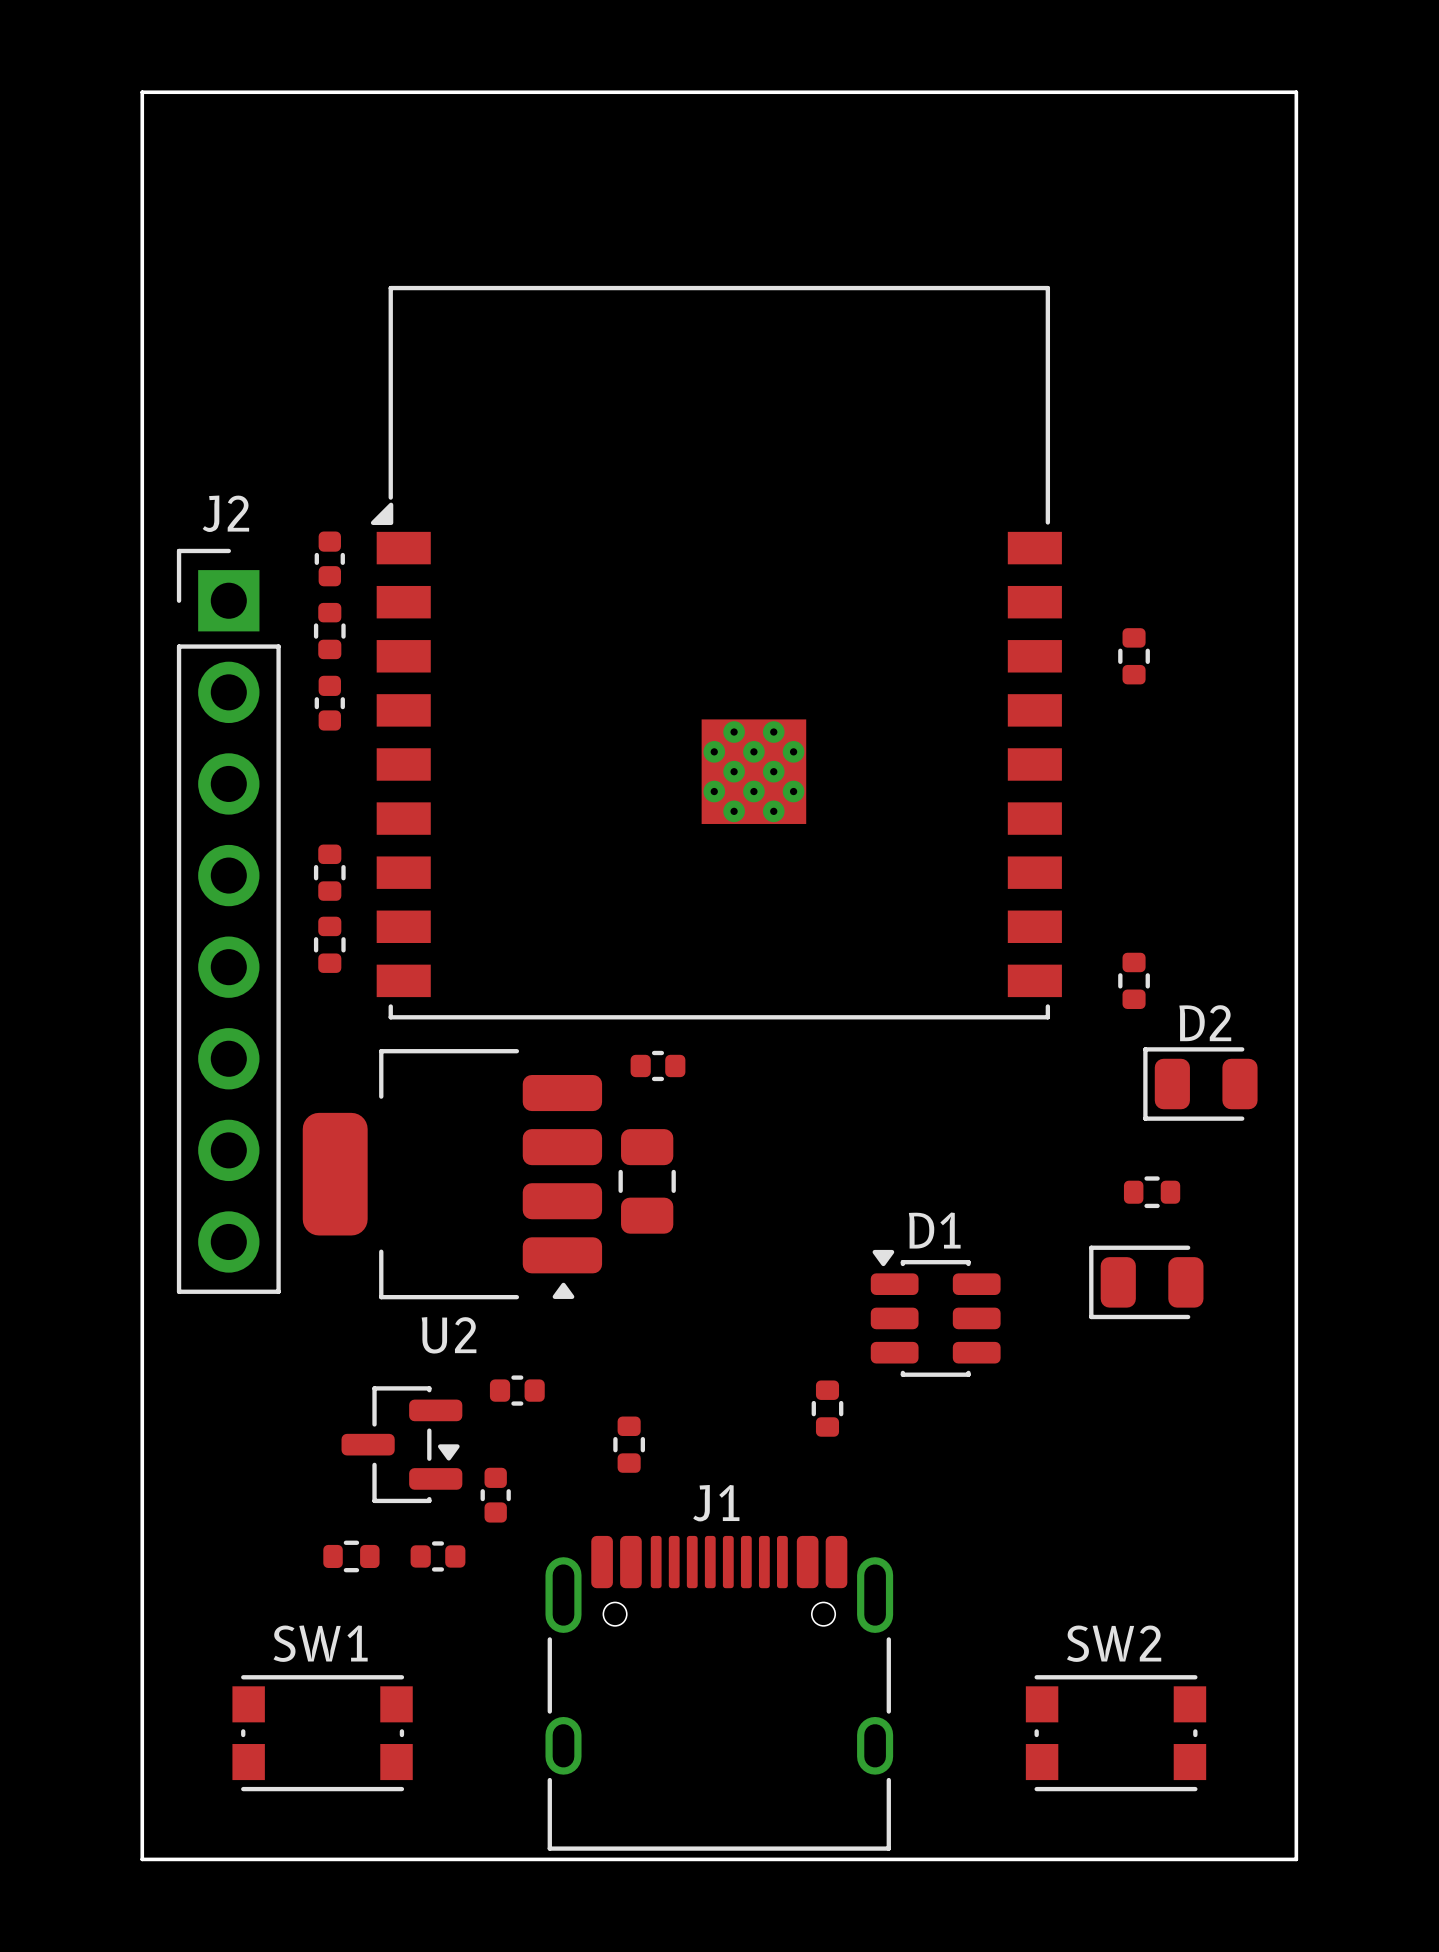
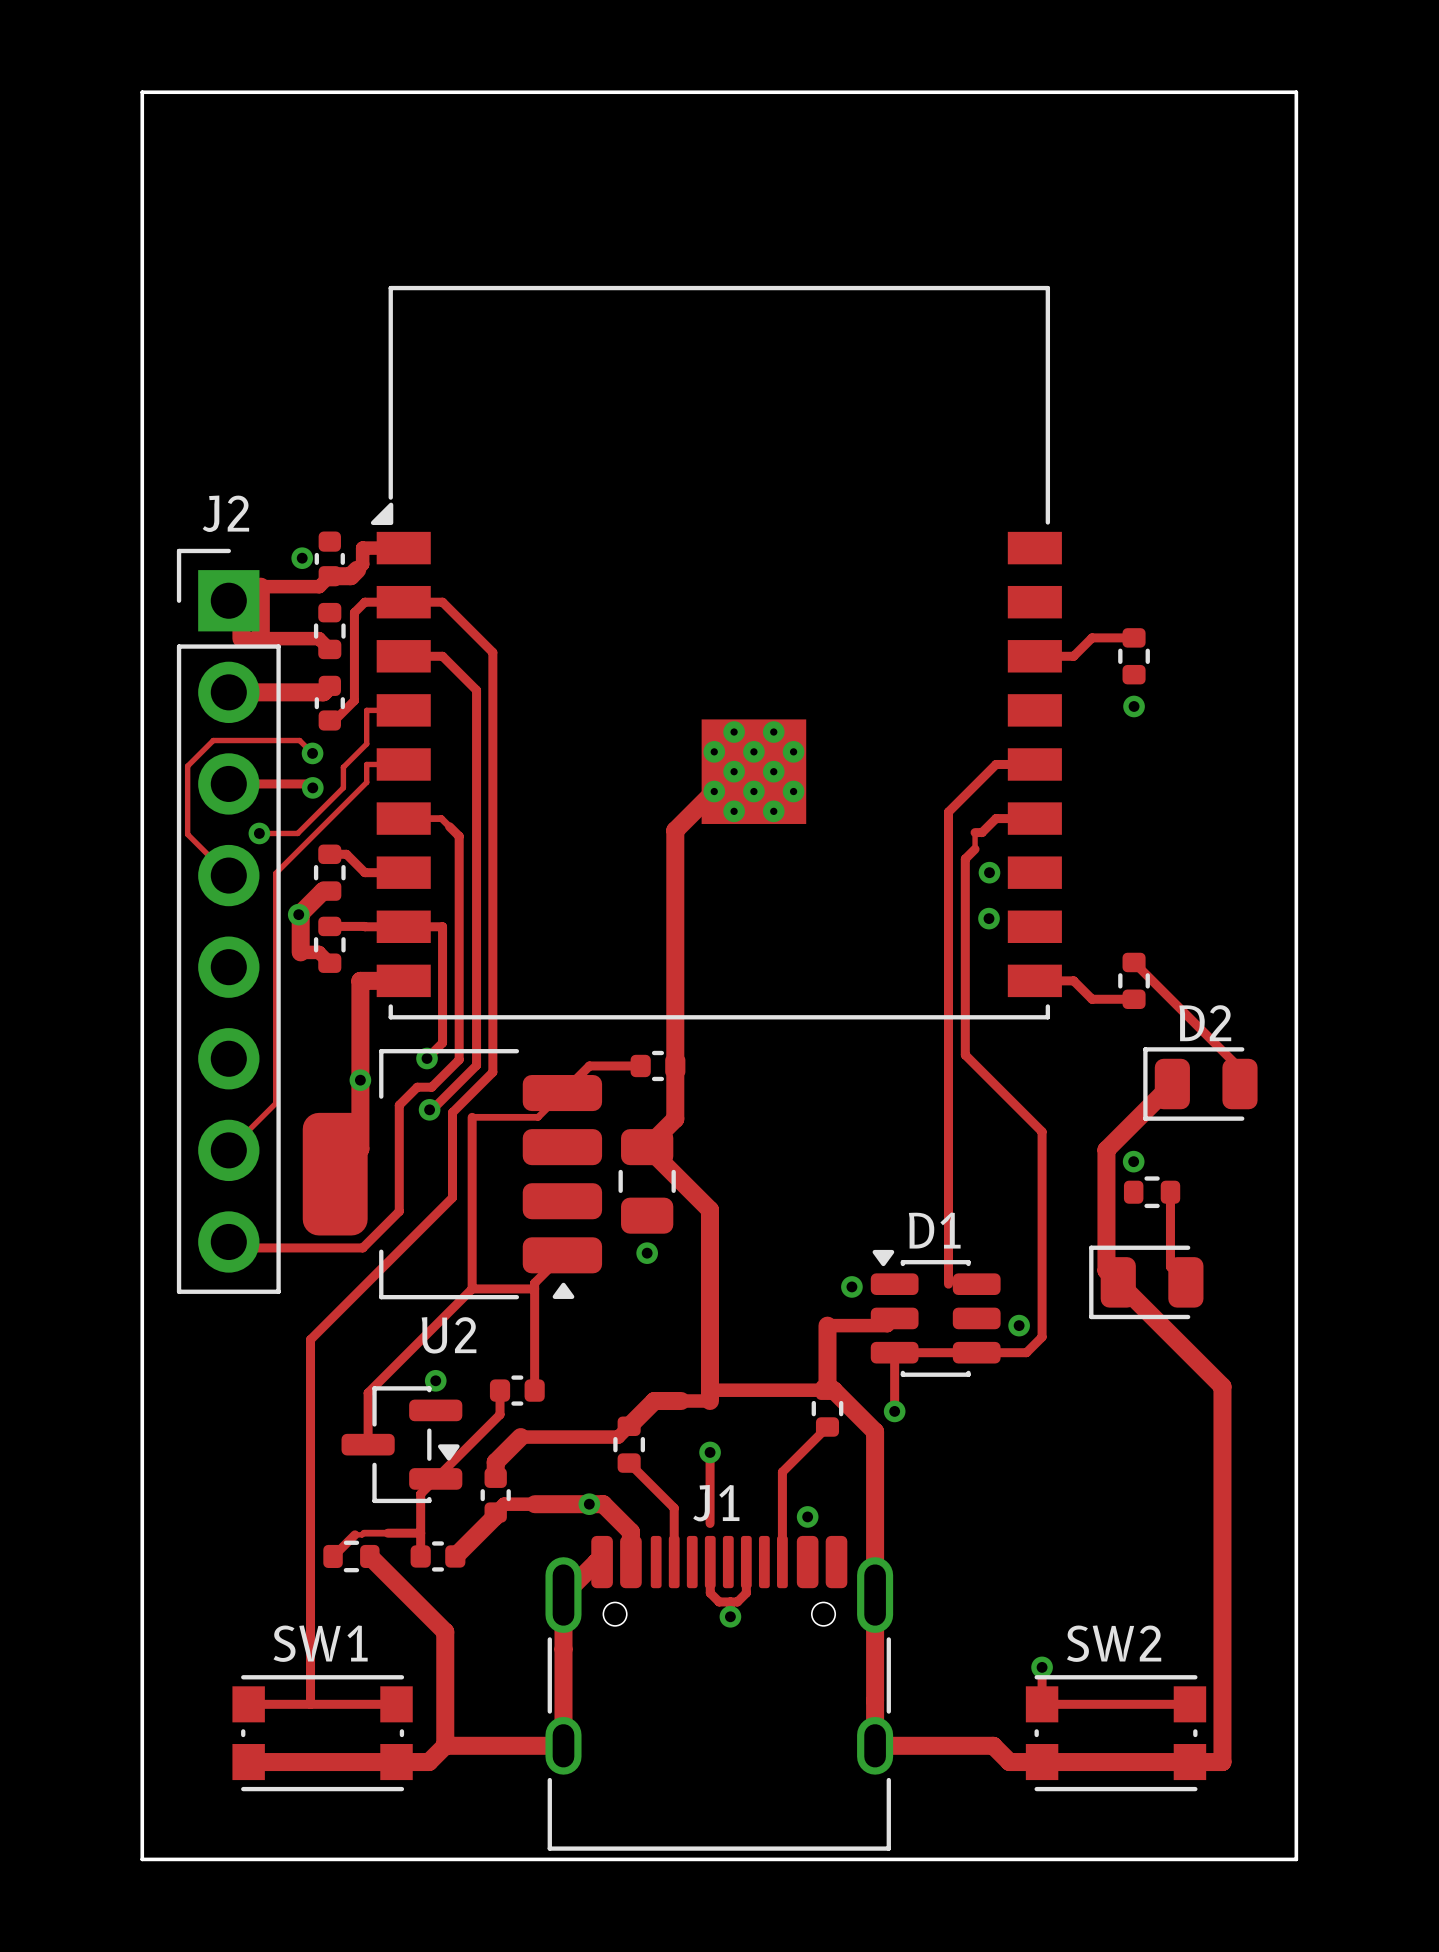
track: none -> (403, 548) (362, 548) (362, 564) (350, 576) (329, 576) (319, 586) (260, 586) (260, 638)
via: none -> (302, 558)
track: none -> (228, 600) (241, 613) (241, 638) (319, 638) (329, 649)
track: none -> (1134, 637) (1092, 637) (1073, 656) (1034, 656)
track: none -> (403, 656) (442, 656) (476, 690) (476, 1065) (432, 1109) (429, 1109)
track: none -> (329, 685) (323, 692) (228, 692)
via: none -> (1134, 706)
track: none -> (403, 710) (366, 710) (366, 744) (343, 767) (343, 787) (297, 833) (259, 833)
track: none -> (329, 720) (334, 720) (354, 700) (354, 612) (364, 602) (442, 602) (492, 652) (492, 1072) (452, 1112) (452, 1197) (310, 1339) (310, 1704)
track: none -> (312, 753) (299, 740) (213, 740) (187, 766) (187, 834) (228, 875)
via: none -> (312, 753)
track: none -> (403, 764) (366, 764) (366, 782) (275, 873) (275, 1103) (228, 1150)
track: none -> (1034, 764) (996, 764) (948, 812) (948, 1284)
track: none -> (228, 783) (308, 783) (312, 787)
via: none -> (312, 787)
track: none -> (714, 791) (675, 830) (675, 1119) (647, 1147) (709, 1209) (709, 1401) (654, 1401) (618, 1437) (520, 1437) (495, 1462) (495, 1477)
track: none -> (403, 818) (441, 818) (459, 836) (459, 1059) (431, 1087) (417, 1087) (399, 1105) (399, 1211) (362, 1247) (234, 1247) (228, 1241)
track: none -> (1034, 818) (996, 818) (982, 832)
track: none -> (981, 832) (975, 832) (975, 849) (965, 858) (965, 1055) (1042, 1131) (1042, 1337) (1026, 1352) (894, 1352) (894, 1411)
via: none -> (259, 833)
track: none -> (329, 854) (346, 854) (364, 872) (403, 872)
via: none -> (989, 872)
track: none -> (329, 891) (323, 891) (300, 913) (300, 952) (319, 952) (329, 963)
via: none -> (298, 914)
via: none -> (988, 918)
track: none -> (329, 926) (364, 926)
track: none -> (364, 926) (442, 926) (442, 1042) (427, 1058)
track: none -> (1134, 962) (1239, 1068) (1239, 1084)
track: none -> (403, 980) (360, 980) (360, 1148) (335, 1174)
track: none -> (1034, 980) (1073, 980) (1092, 999) (1134, 999)
via: none -> (427, 1058)
track: none -> (640, 1065) (589, 1065) (538, 1117) (472, 1117) (472, 1288)
via: none -> (360, 1080)
track: none -> (1172, 1084) (1106, 1149) (1106, 1270) (1222, 1386) (1222, 1762) (1009, 1762) (993, 1745) (875, 1745) (875, 1431) (833, 1390) (827, 1390)
via: none -> (429, 1109)
via: none -> (1133, 1161)
track: none -> (1170, 1192) (1170, 1266) (1185, 1282)
via: none -> (647, 1253)
track: none -> (562, 1255) (534, 1283) (534, 1390)
via: none -> (851, 1286)
track: none -> (472, 1288) (534, 1288)
track: none -> (472, 1288) (368, 1392) (368, 1444)
track: none -> (894, 1318) (887, 1325) (827, 1325) (827, 1390)
via: none -> (1019, 1325)
via: none -> (435, 1380)
track: none -> (500, 1390) (500, 1414) (420, 1493) (420, 1556)
track: none -> (709, 1390) (827, 1390)
via: none -> (894, 1411)
track: none -> (827, 1426) (782, 1472) (782, 1562)
track: none -> (710, 1452) (710, 1523)
via: none -> (710, 1452)
track: none -> (629, 1463) (674, 1508) (674, 1562)
via: none -> (589, 1504)
via: none -> (807, 1516)
track: none -> (420, 1533) (354, 1534) (333, 1556)
track: none -> (369, 1556) (445, 1631) (445, 1745)
track: none -> (455, 1556) (495, 1516) (495, 1512) (503, 1504) (603, 1504) (630, 1531) (630, 1562)
track: none -> (602, 1562) (596, 1562) (563, 1595) (563, 1745) (445, 1745)
track: none -> (710, 1562) (710, 1593) (719, 1601) (737, 1601) (746, 1593) (746, 1562)
via: none -> (730, 1616)
track: none -> (1042, 1667) (1042, 1704) (1189, 1704)
via: none -> (1042, 1667)
track: none -> (248, 1704) (396, 1704)
track: none -> (445, 1745) (429, 1762) (248, 1762)

